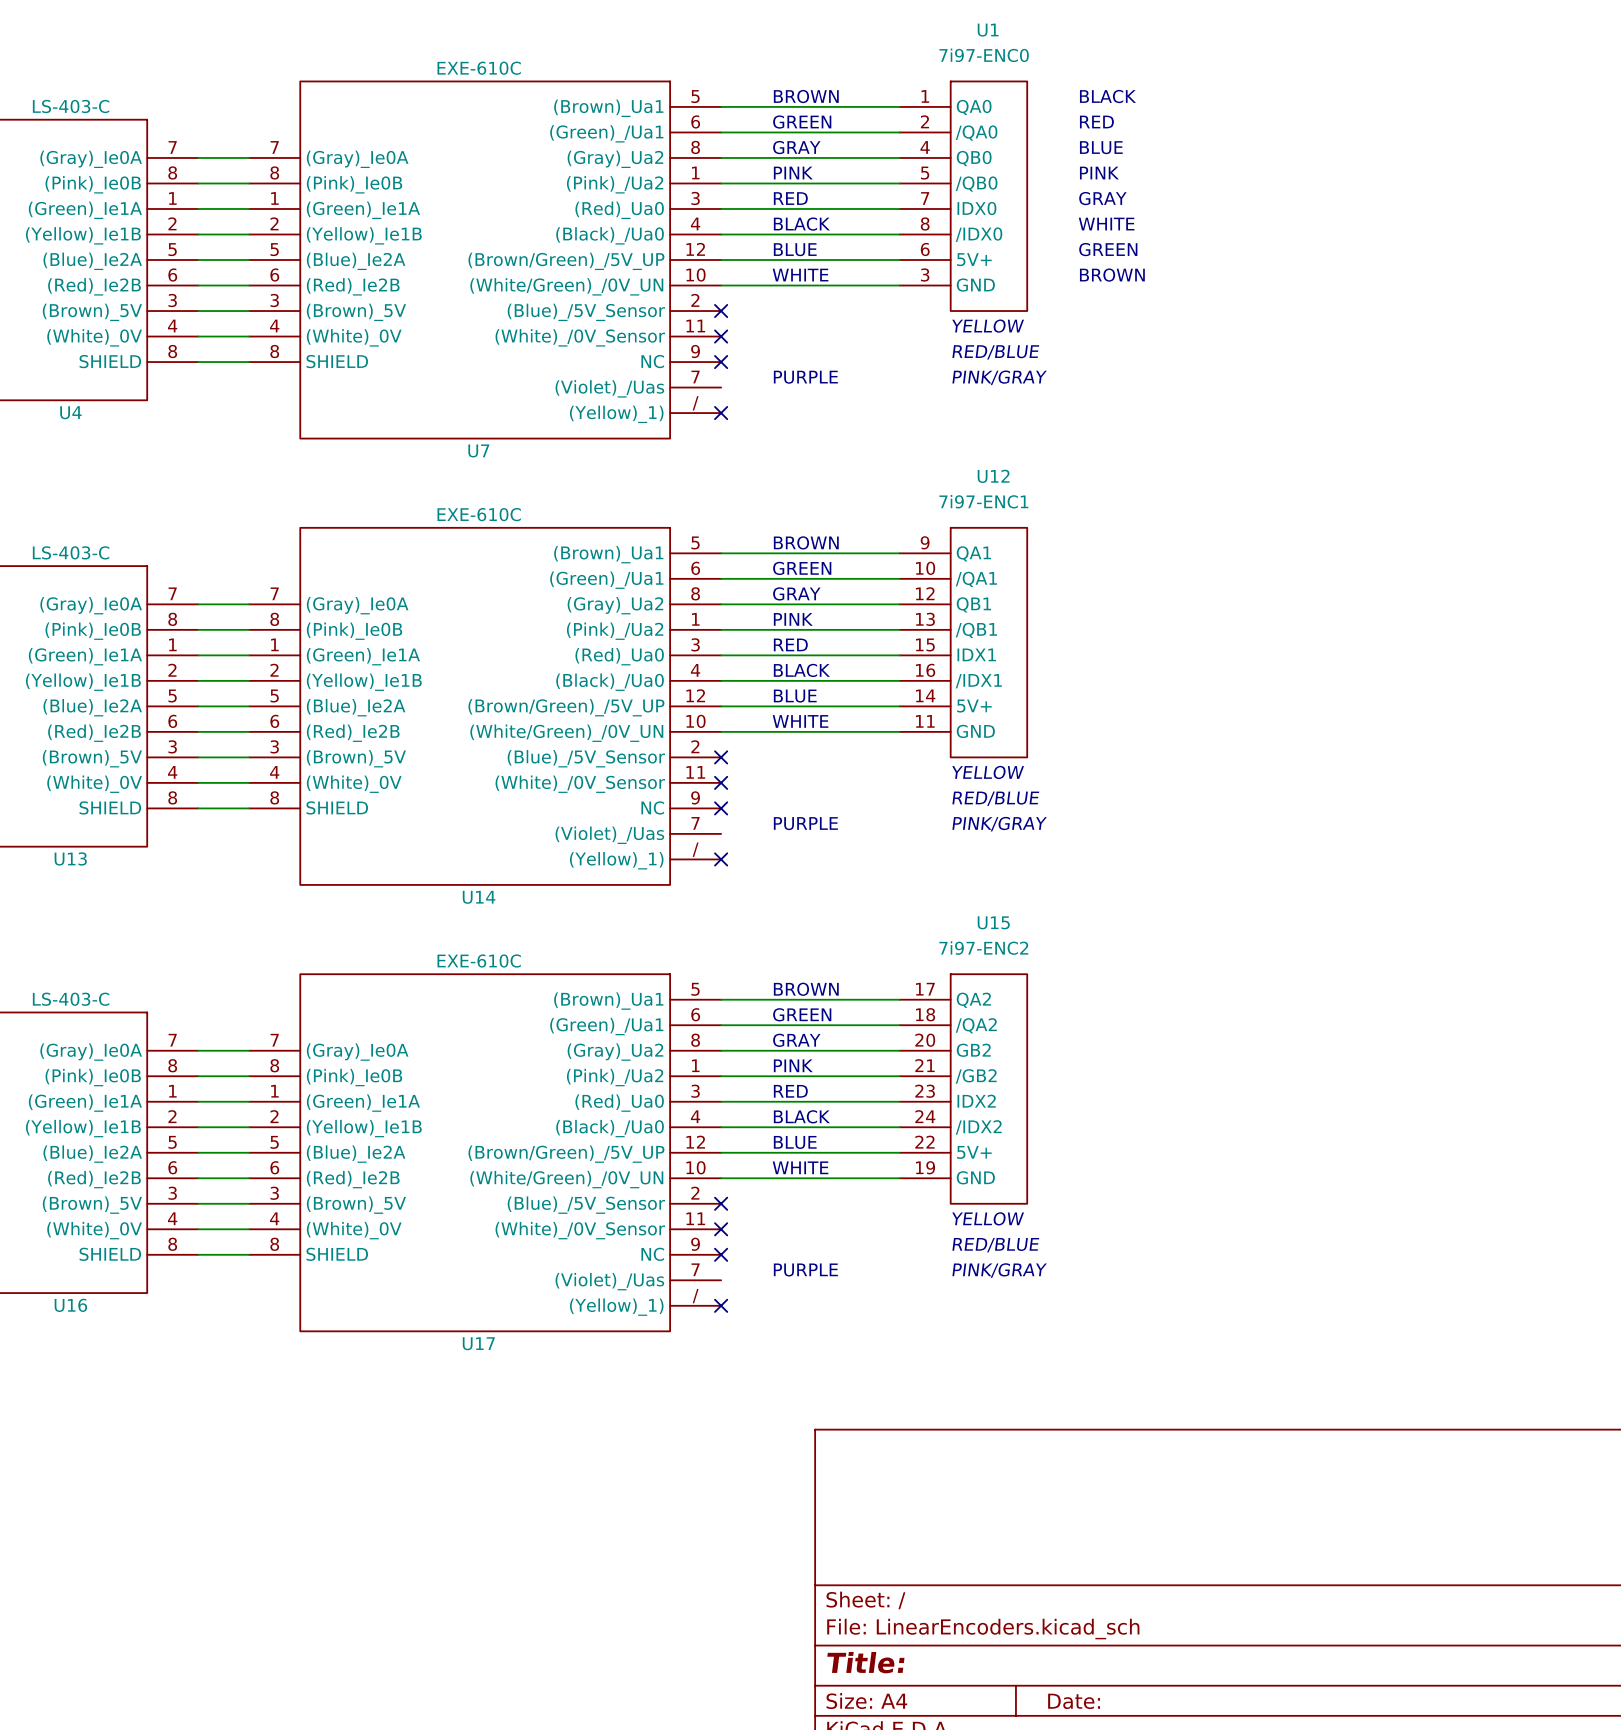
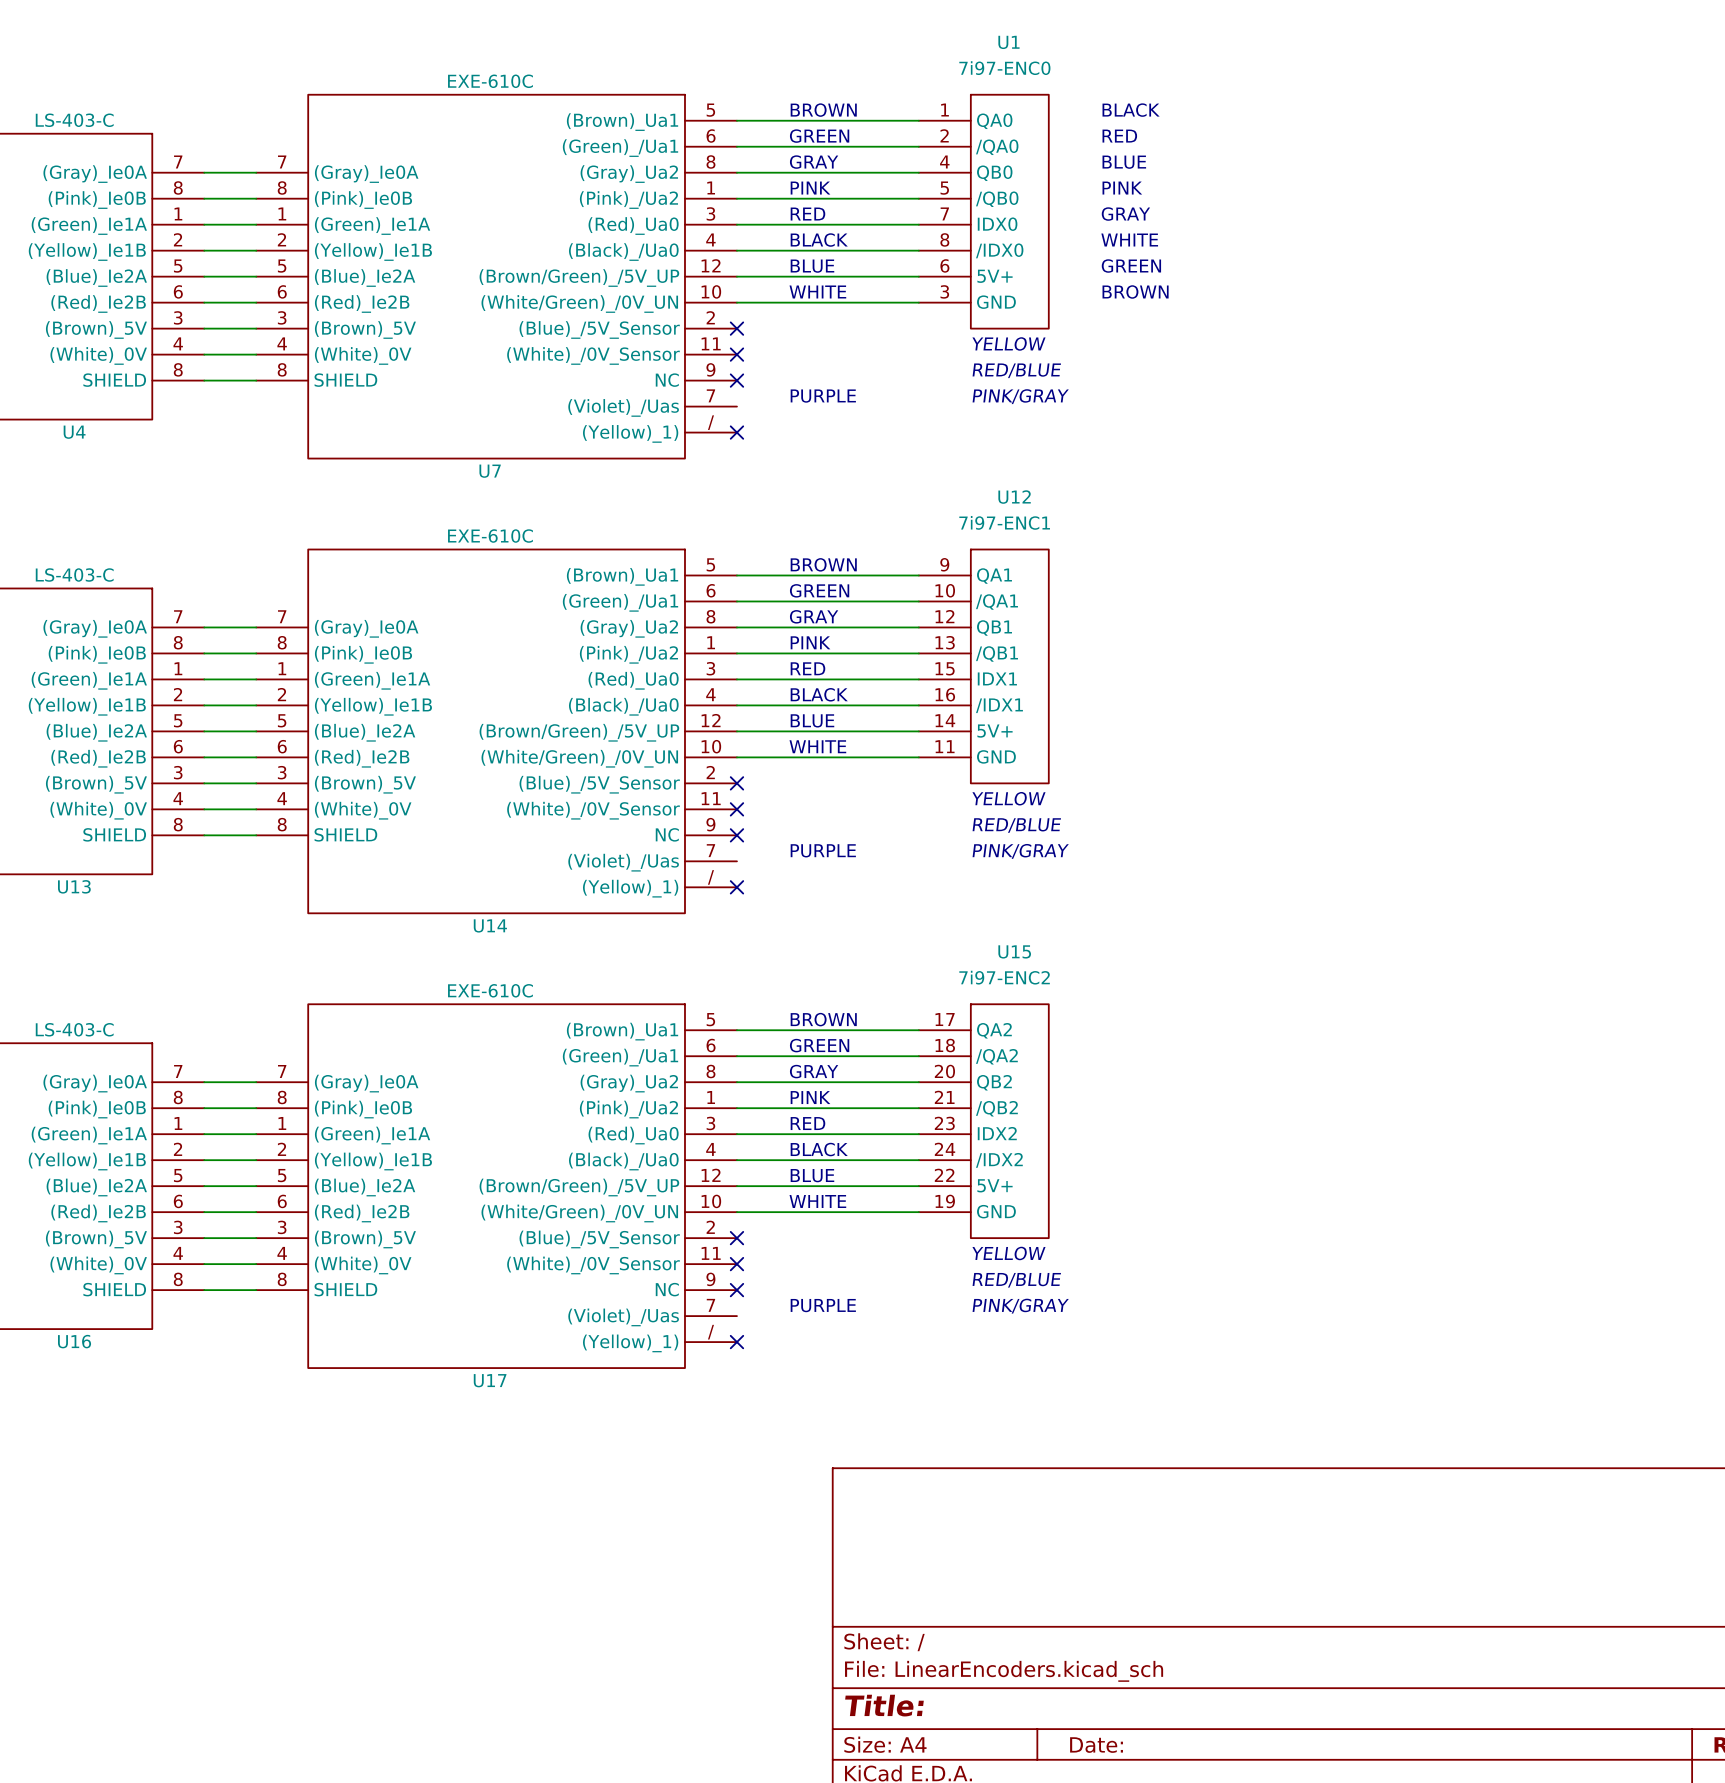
U15 pin name: GB2 (973, 1050) -> QB2 (994, 1082)
U15 pin name: /GB2 (976, 1076) -> /QB2 (996, 1108)

